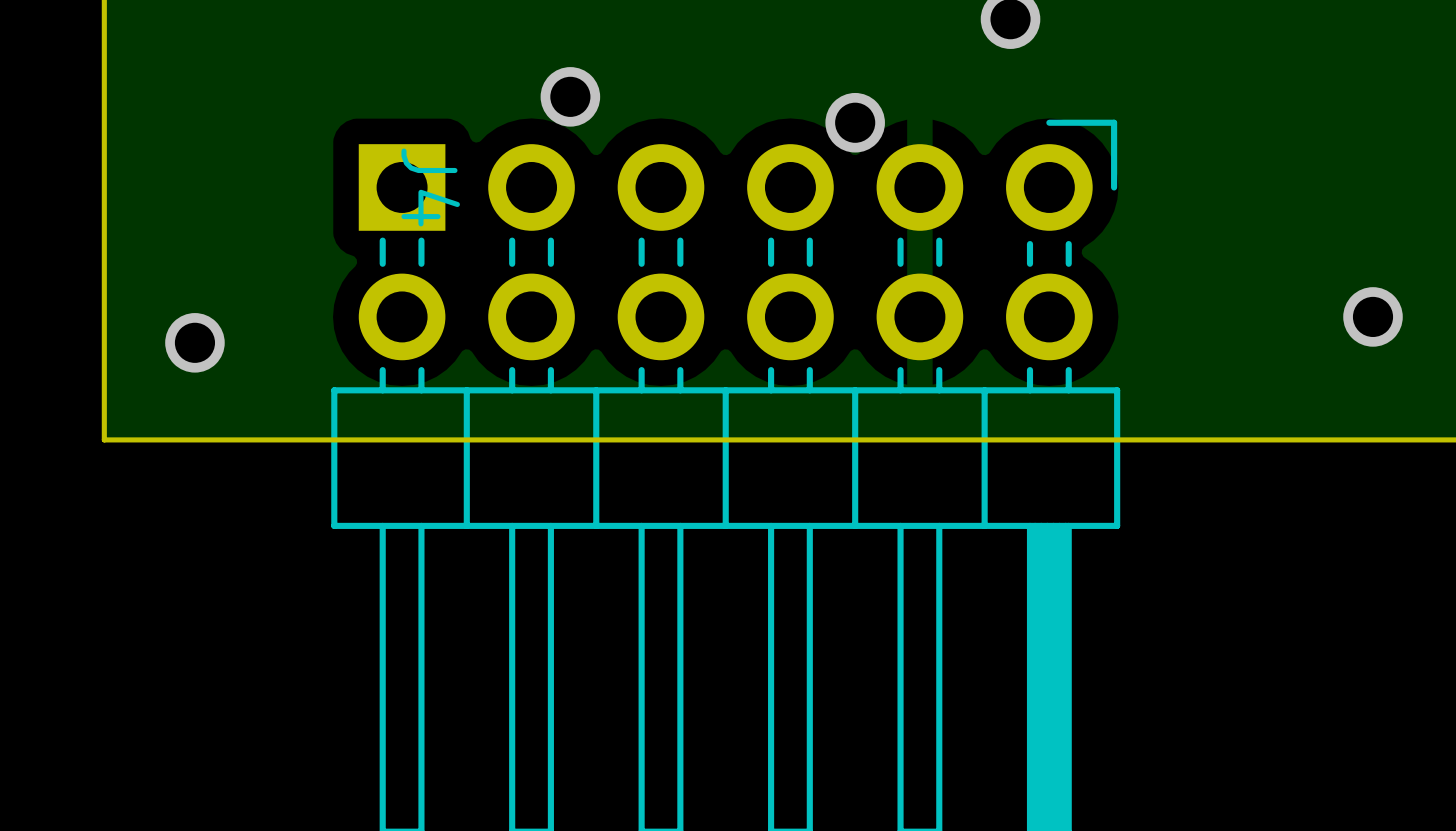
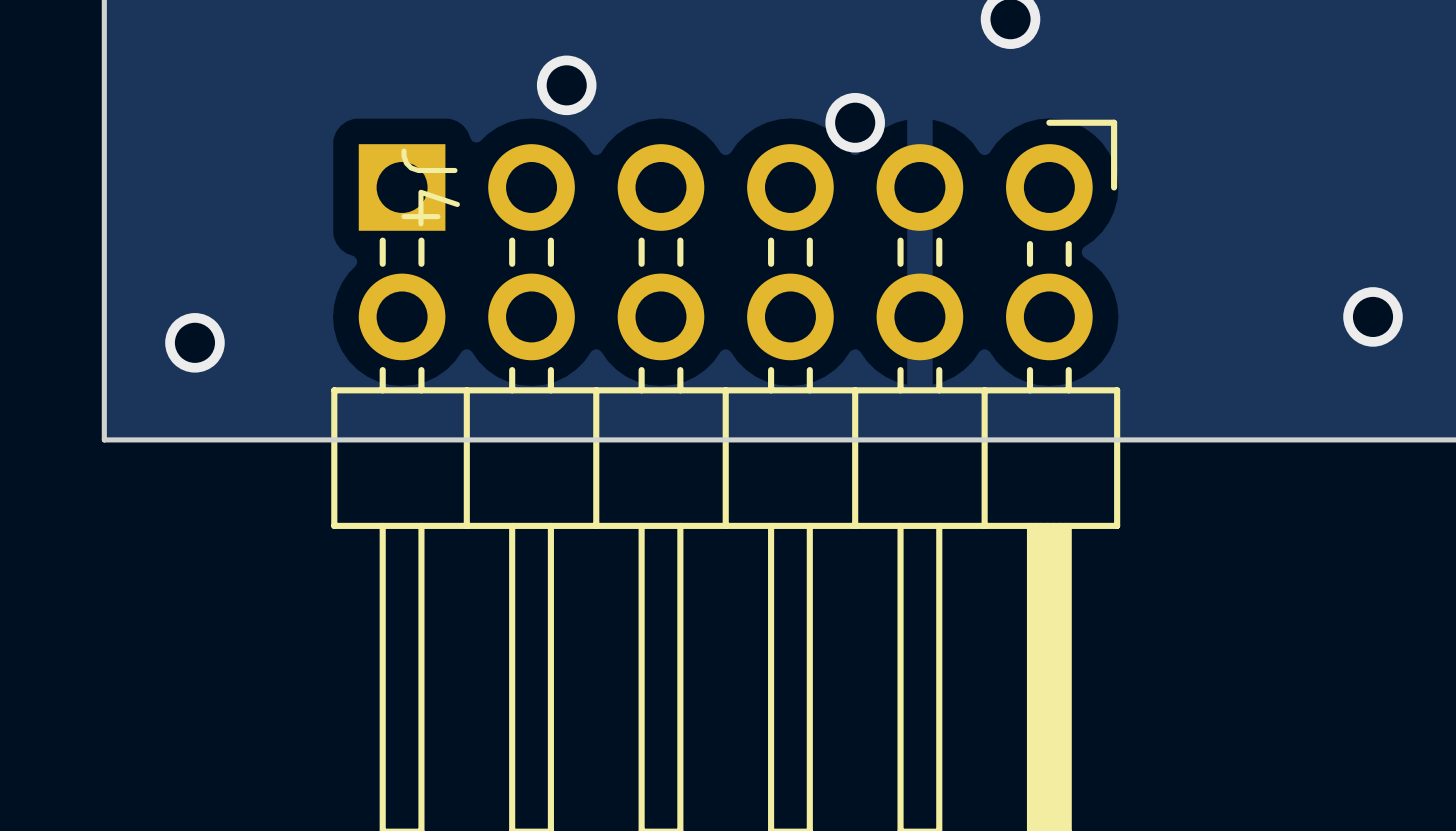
via position: (570, 96) -> (566, 85)

